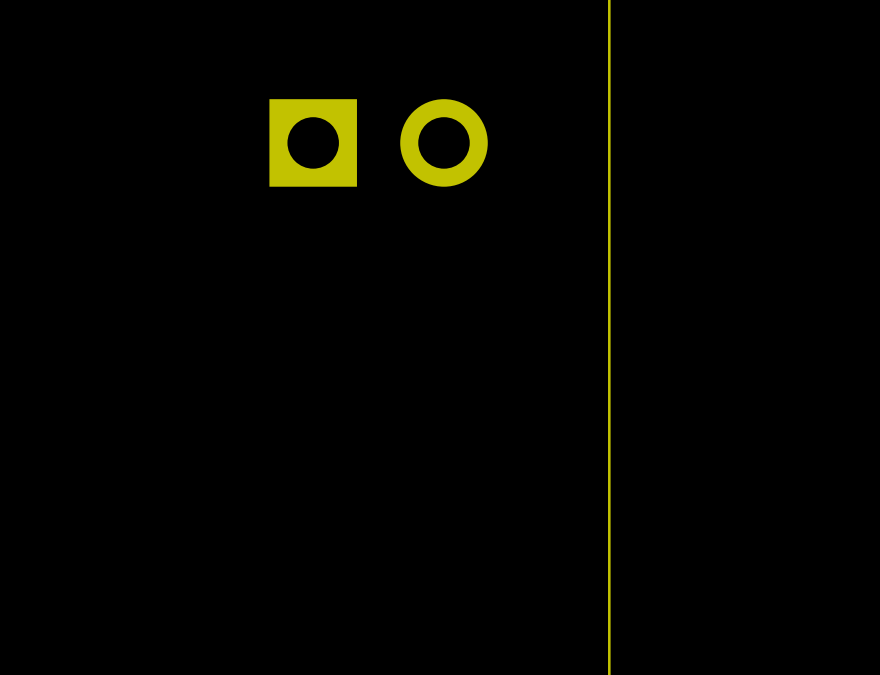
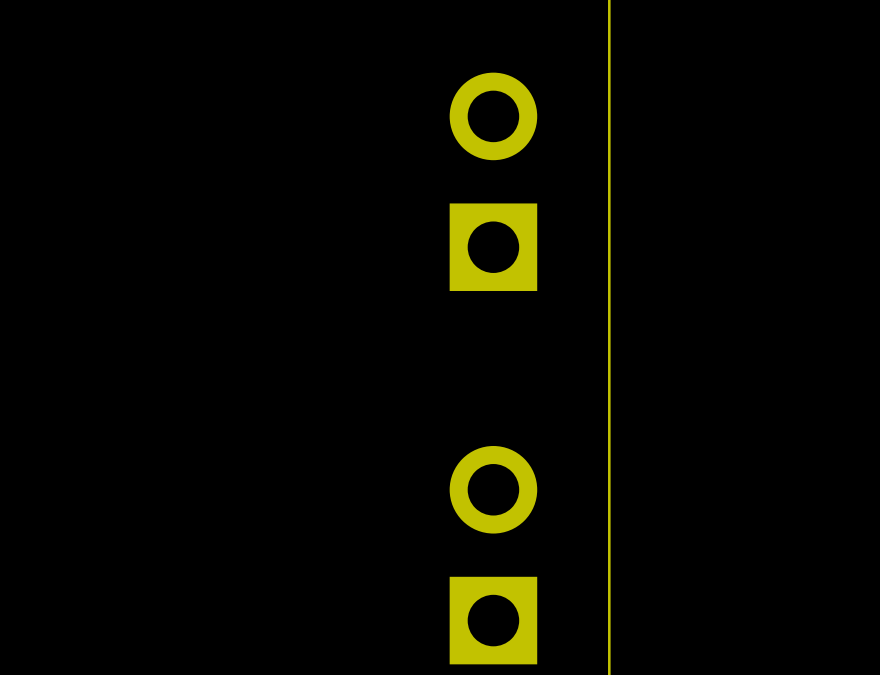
part rotation: 0° (378, 142) -> 90° counterclockwise (493, 181)
part: none -> (493, 555)

